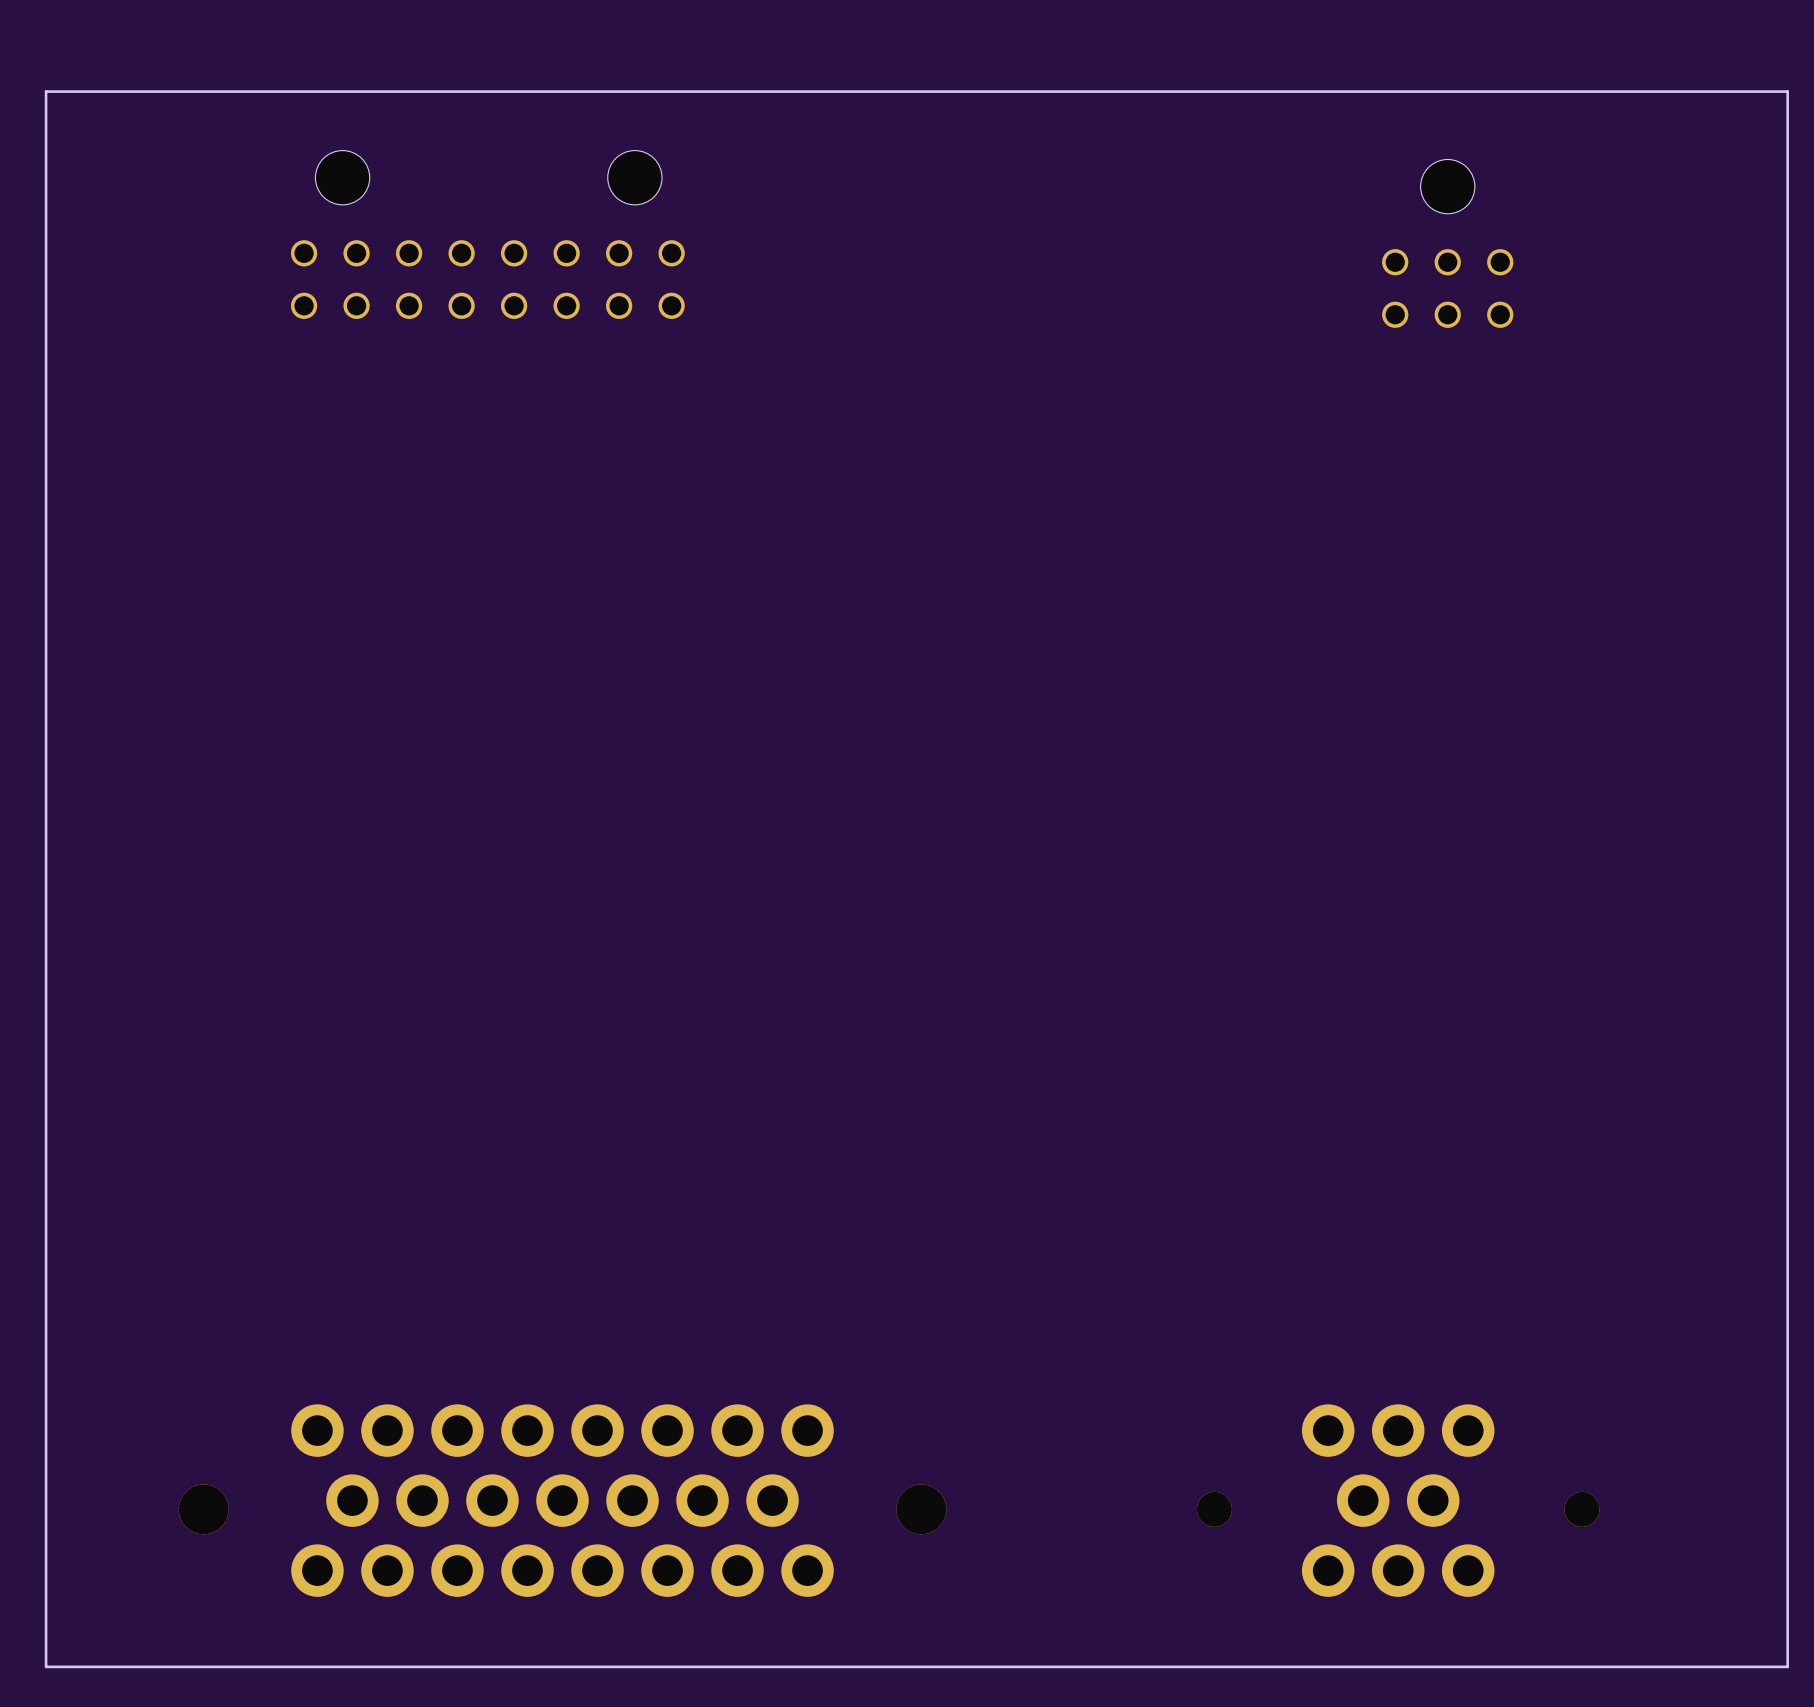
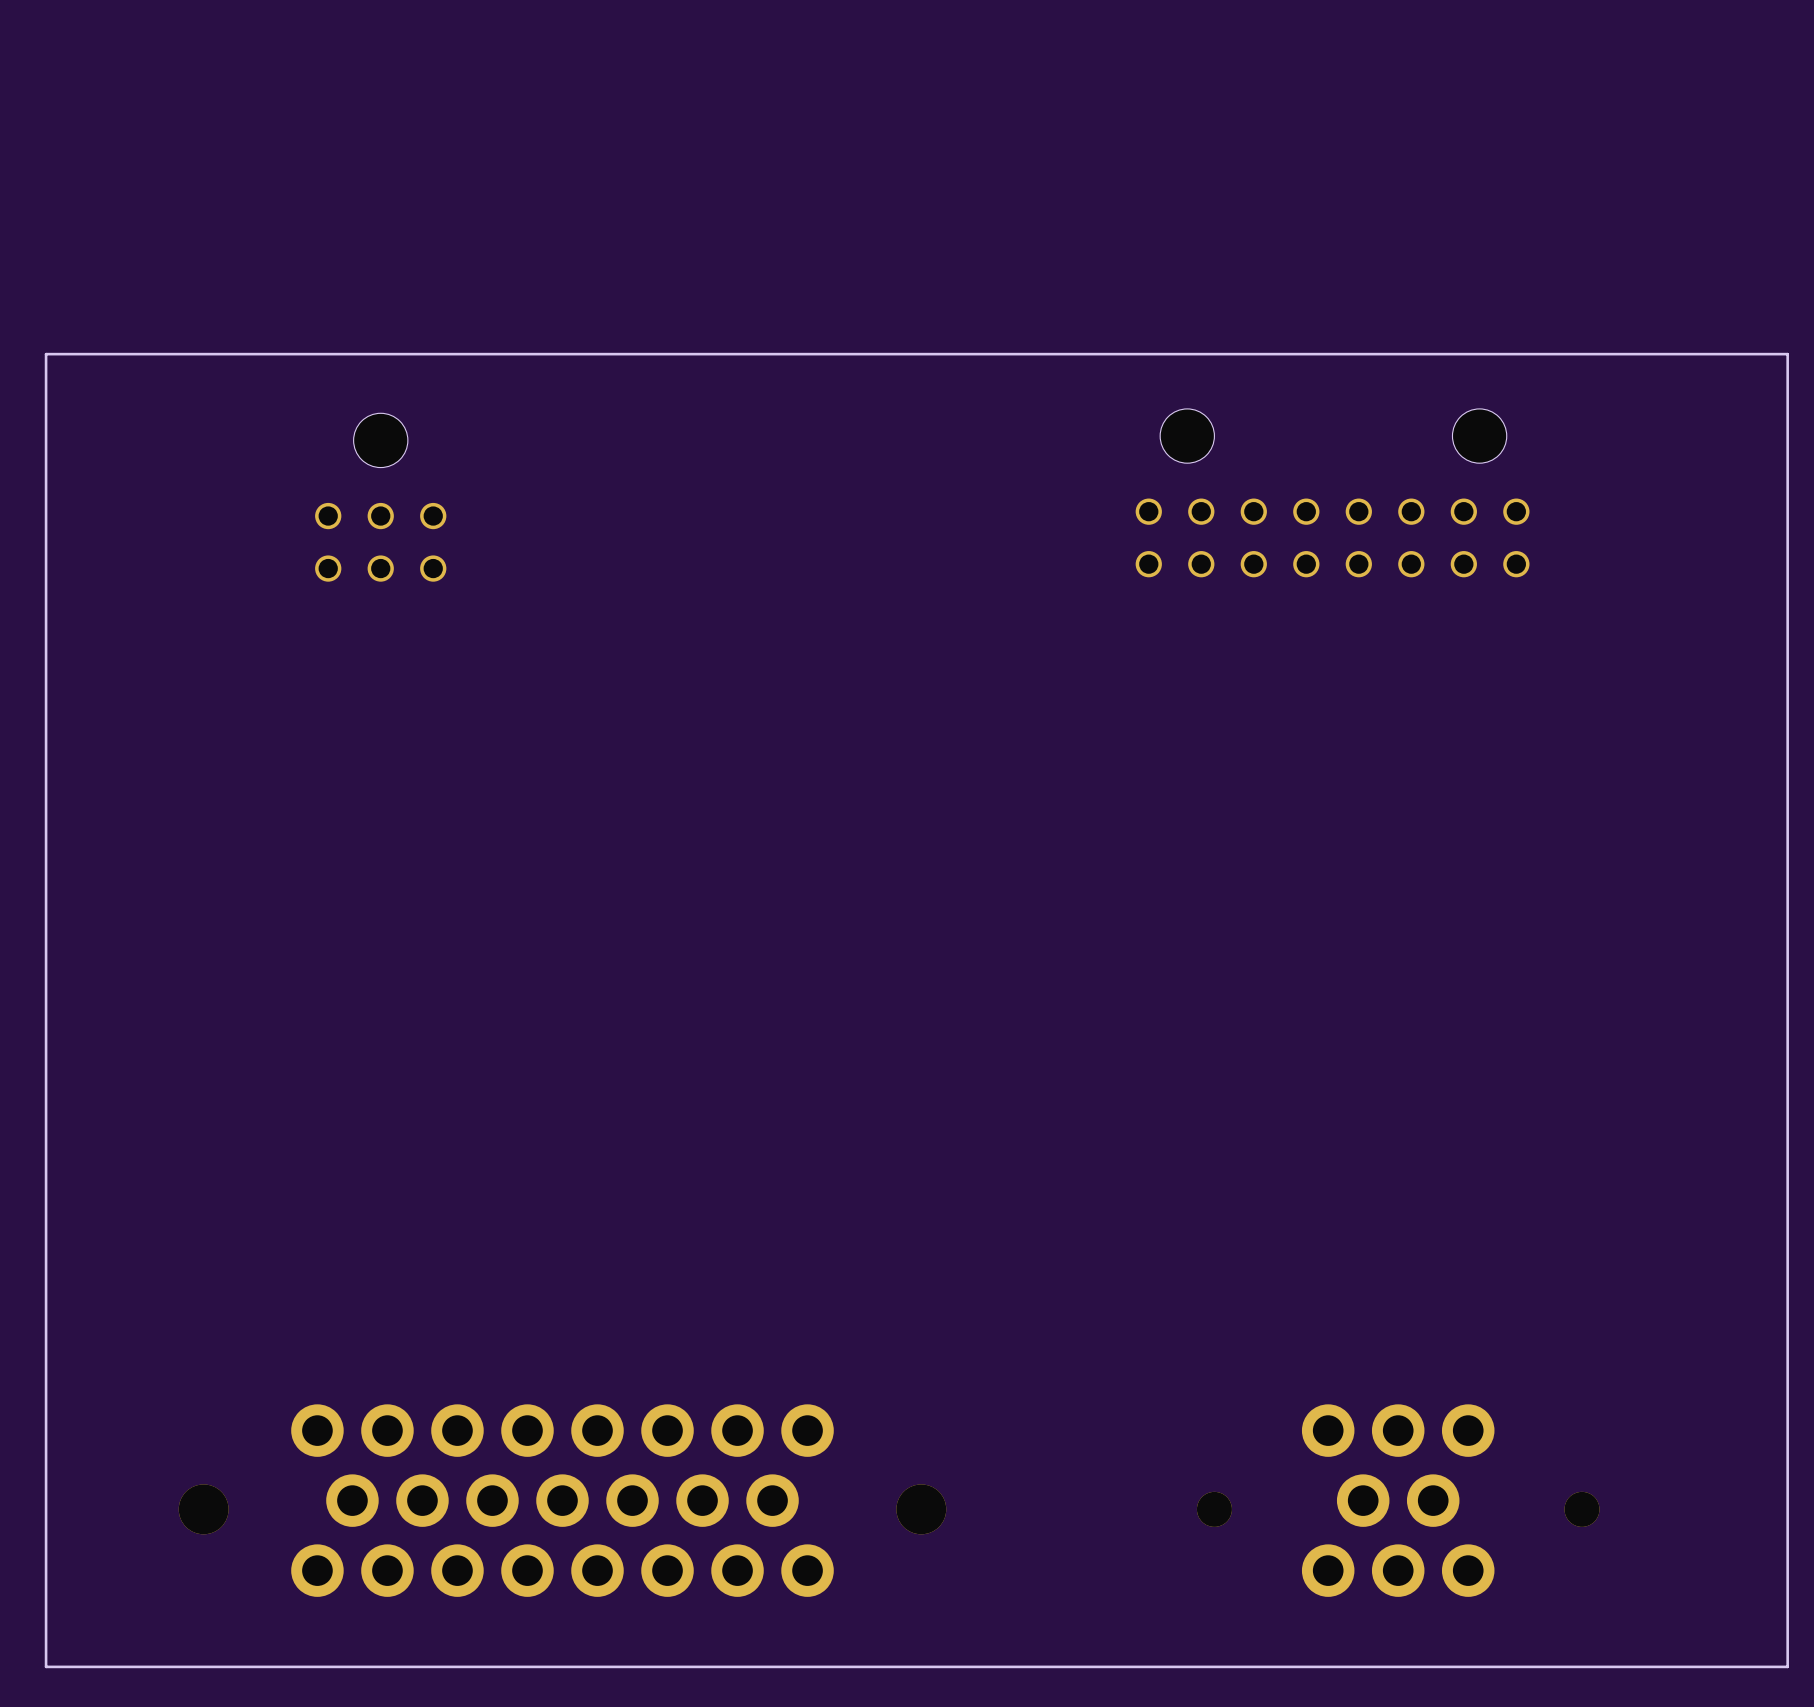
part: (487, 234) -> none
part: (1447, 243) -> none
board edge: (1787, 354) (1787, 91) (46, 91) (46, 354) -> (1787, 354) (46, 354)
part: none -> (1332, 493)
part: none -> (380, 497)

